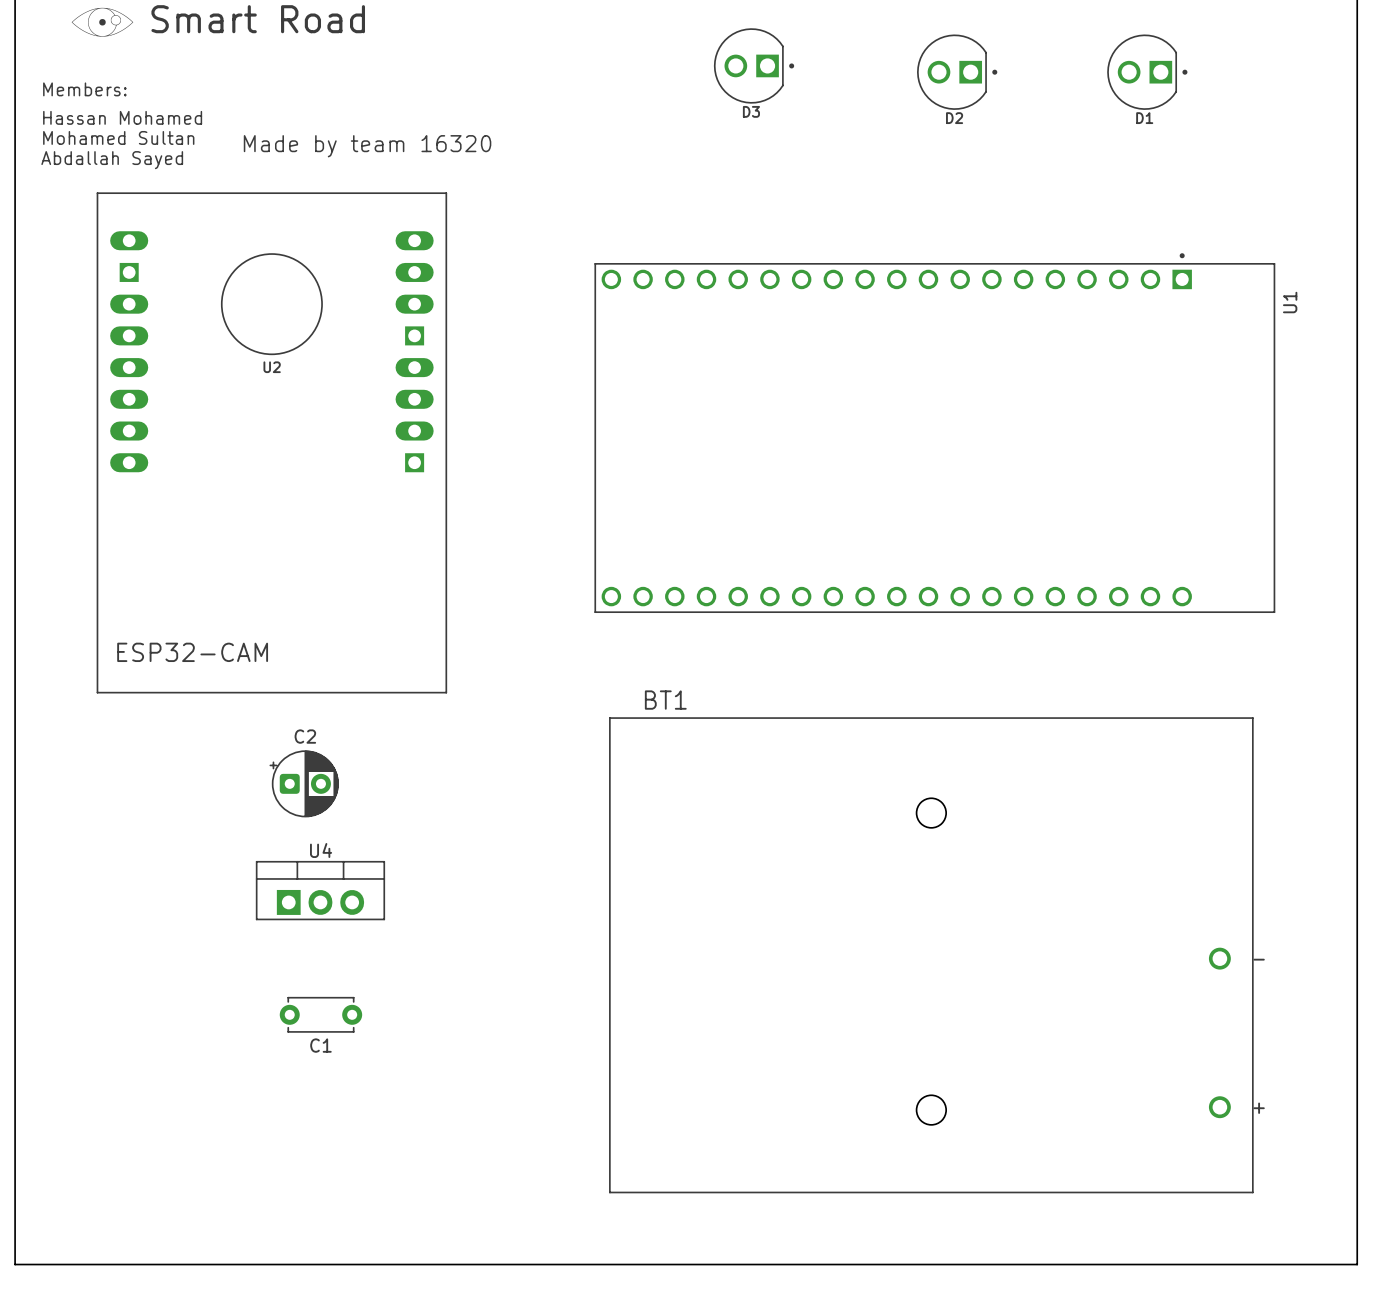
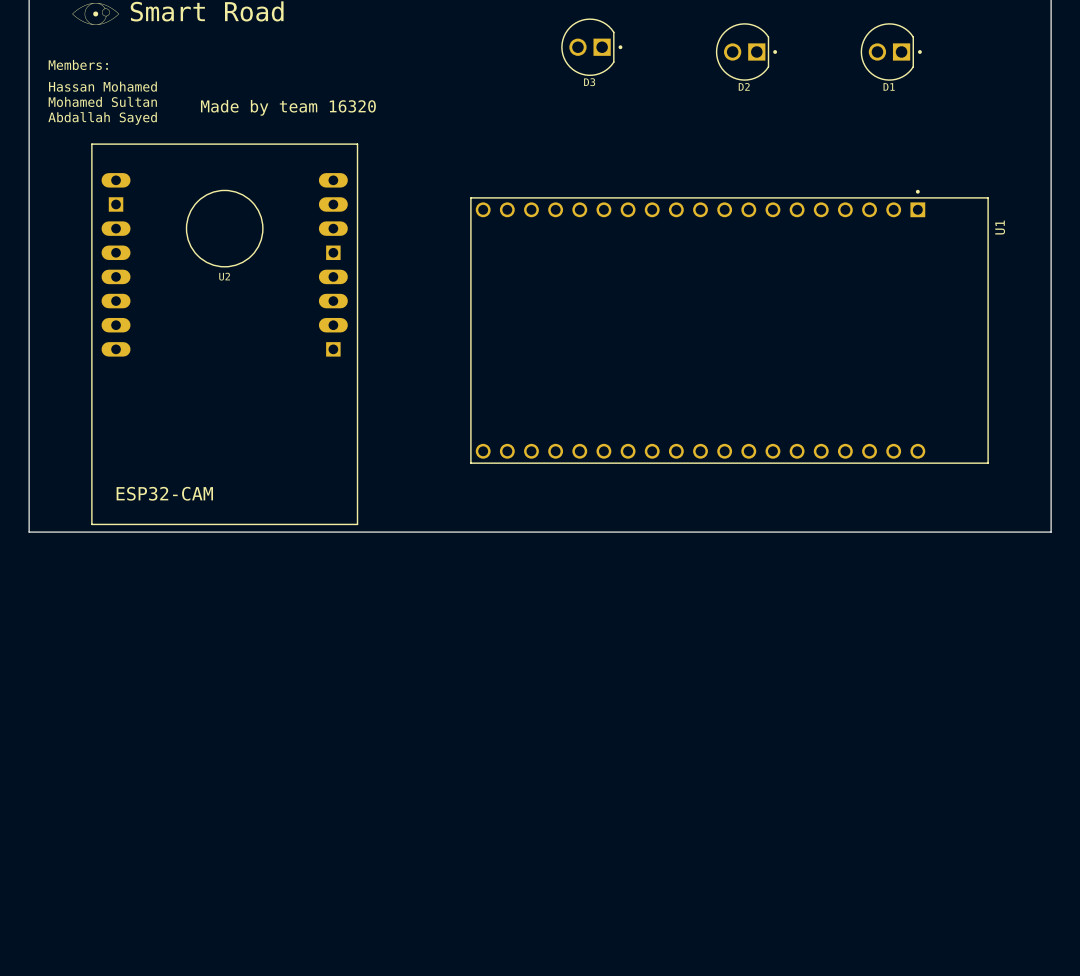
board edge: (15, 702) (15, 1264) (1357, 1264) (1357, 702) -> (29, 532) (1051, 532)
C2: (304, 783) -> none
U4: (320, 890) -> none
BT1: (931, 955) -> none
C1: (320, 1014) -> none

